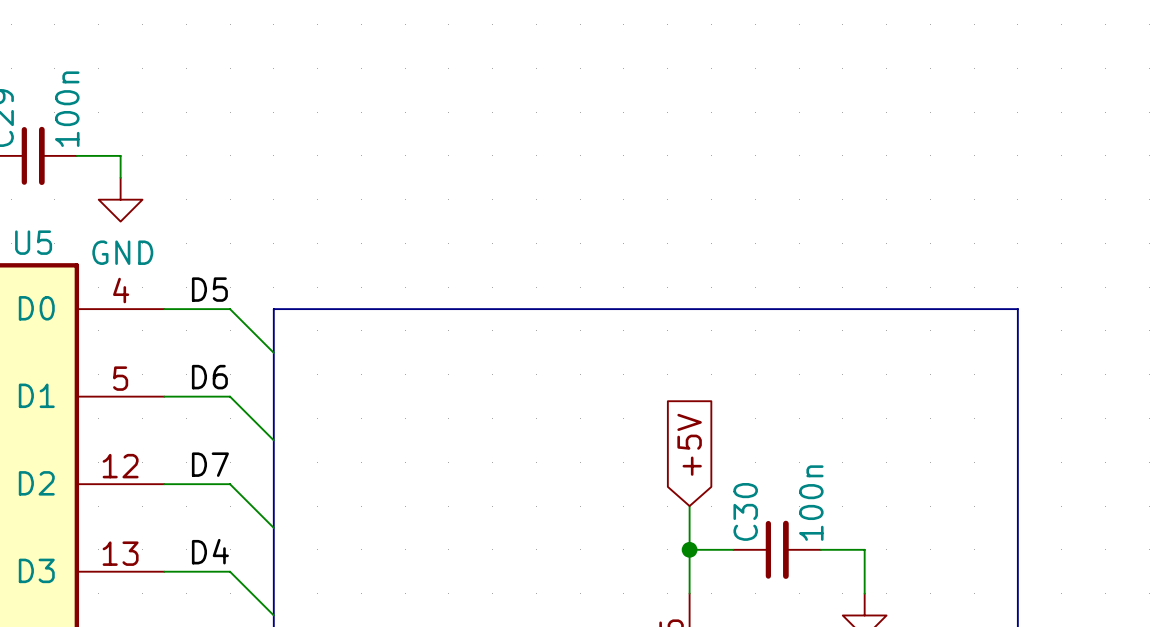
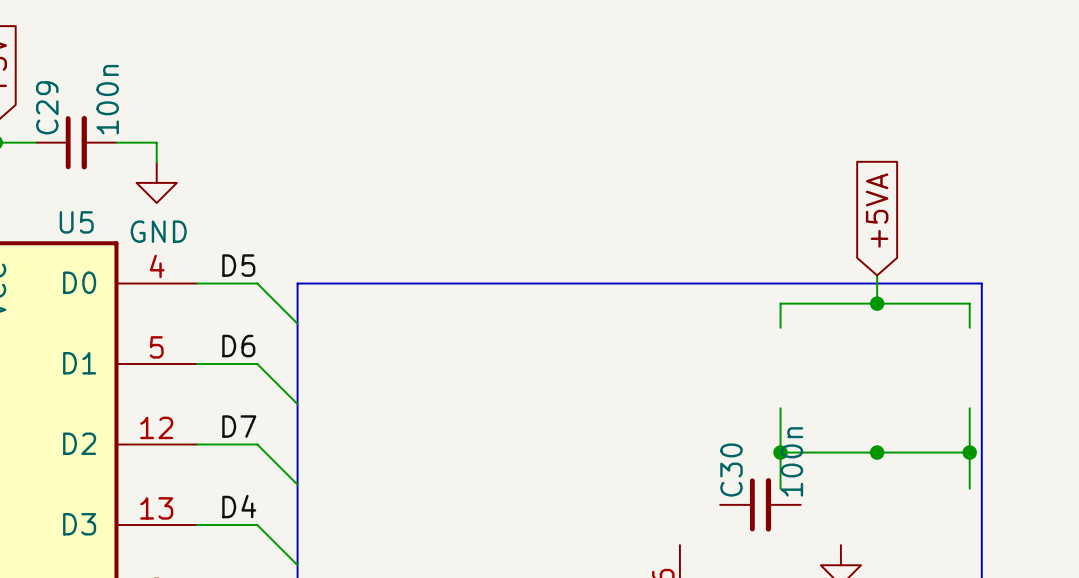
global label: none -> +5VA (877, 210)
wire: none -> (877, 275) (877, 303)
junction: none -> (877, 303)
wire: none -> (780, 327) (780, 303) (969, 303) (969, 327)
global label: +5V (689, 444) -> none
wire: none -> (969, 408) (969, 488)
wire: none -> (780, 452) (969, 452)
junction: none -> (780, 452)
junction: none -> (877, 452)
junction: none -> (969, 452)
wire: (689, 506) (689, 593) -> (780, 408) (780, 488)
wire: (689, 549) (733, 549) -> none
junction: (689, 549) -> none
wire: (820, 549) (864, 549) (864, 593) -> none

